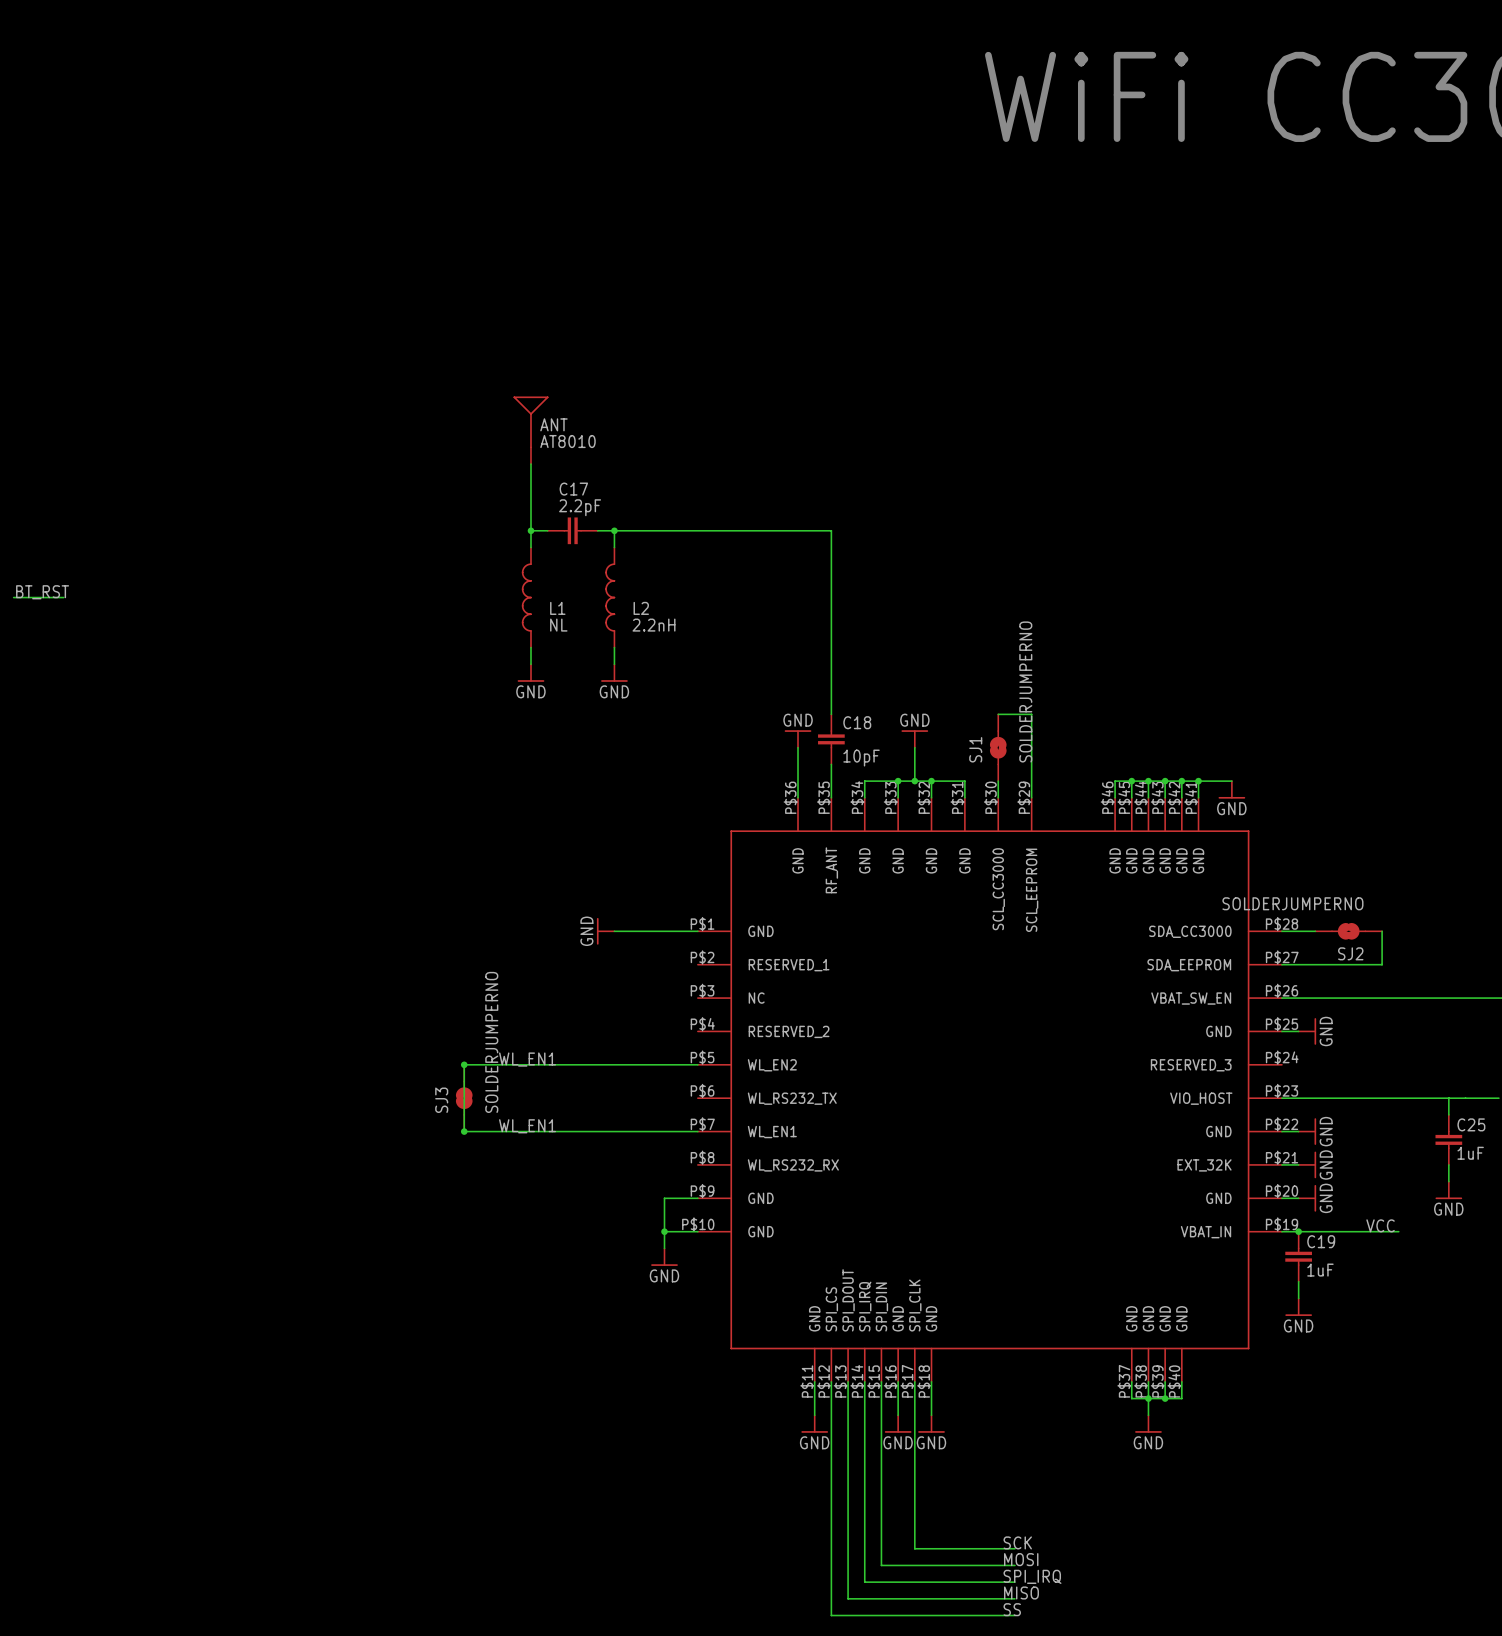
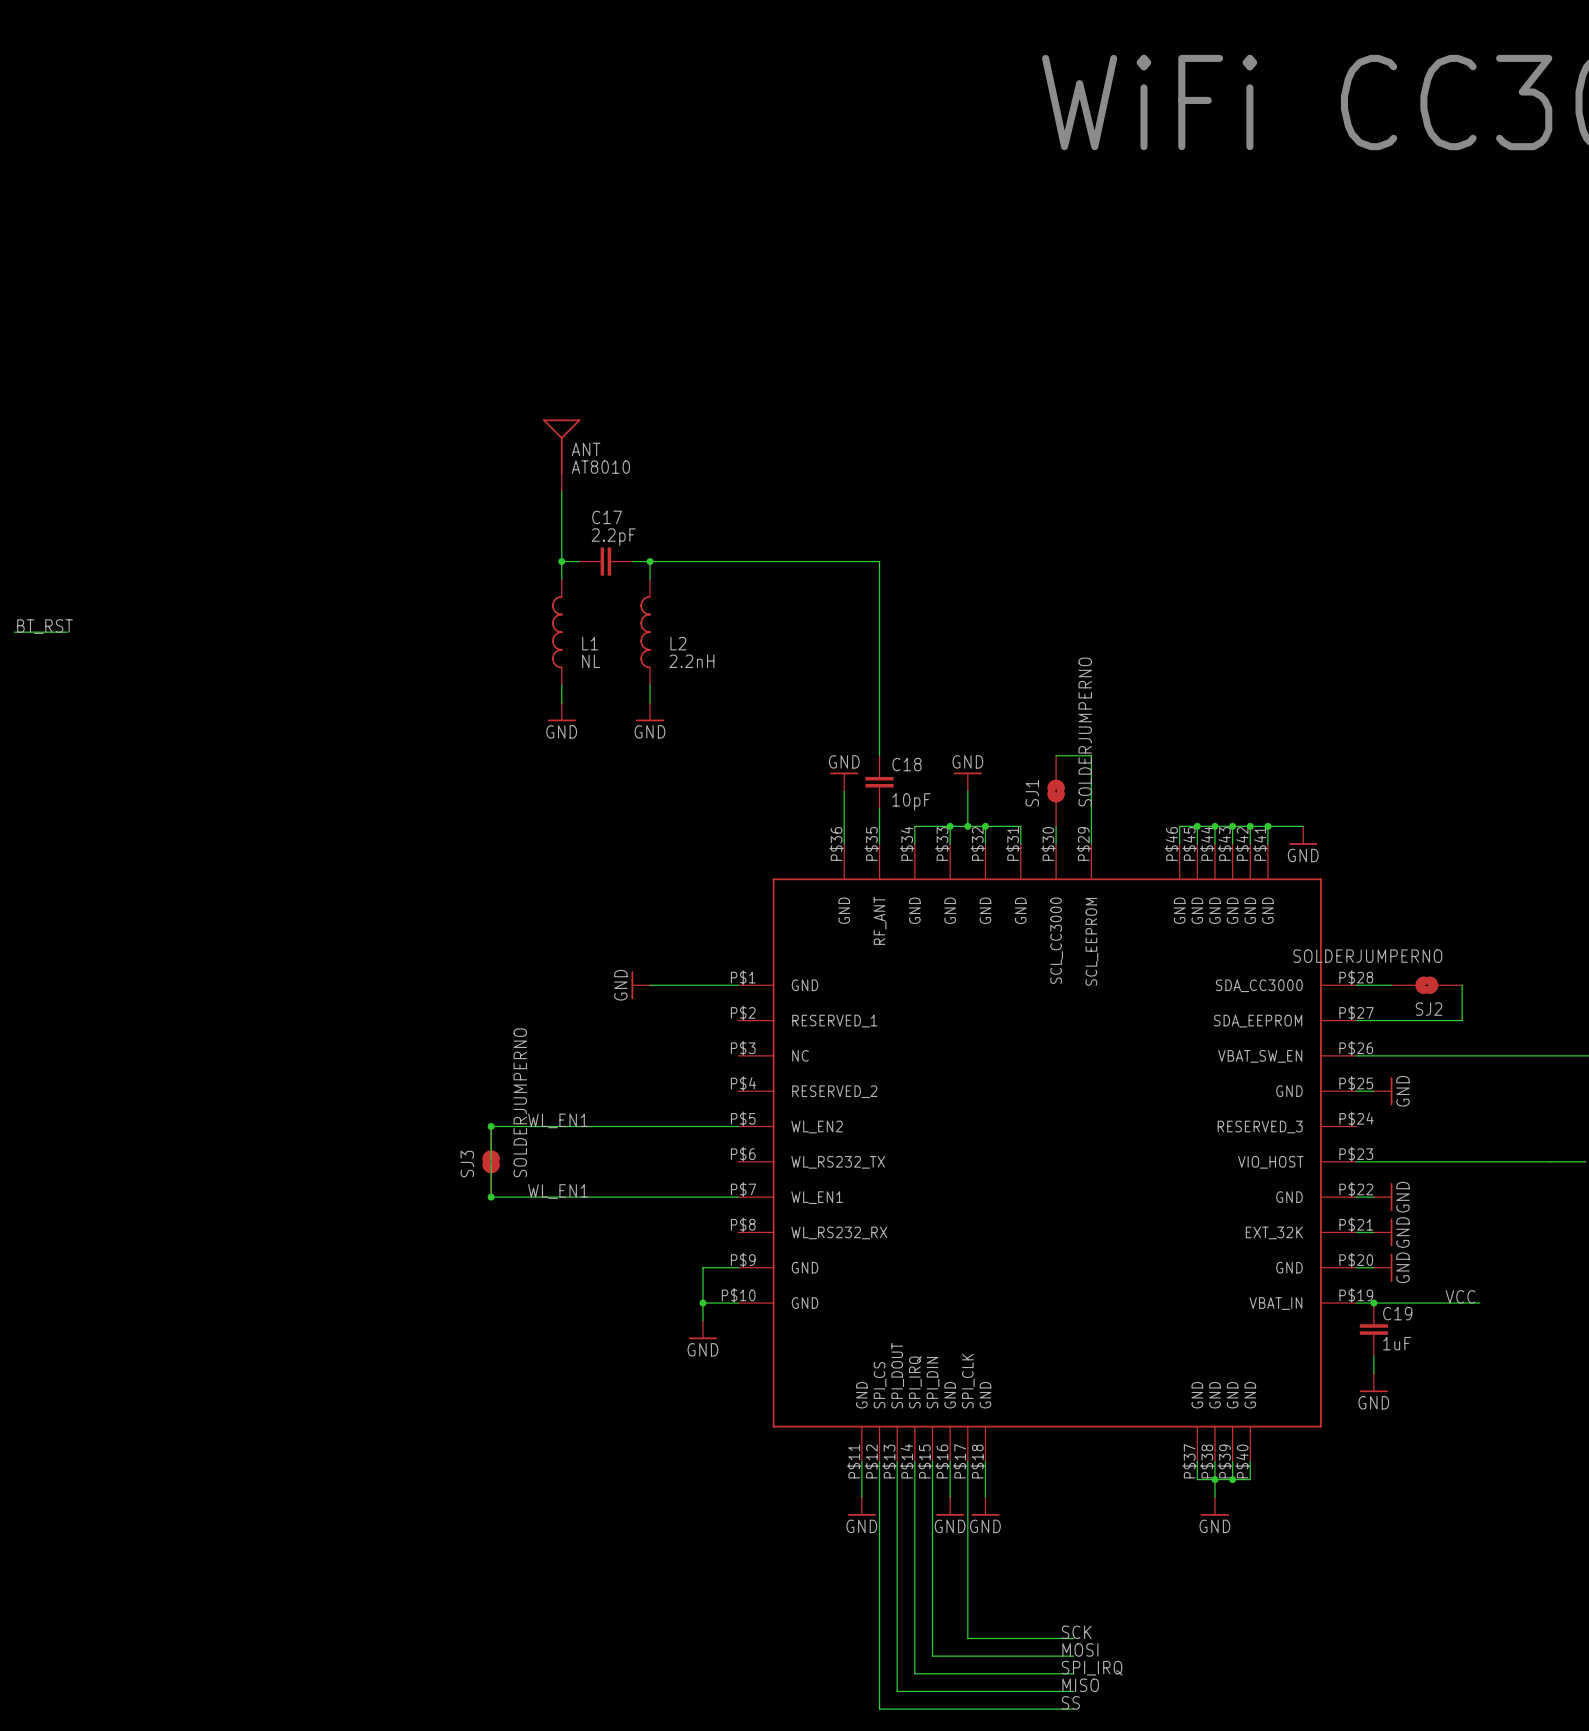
wire: (1448, 1098) (1448, 1114) -> none
C25: 1uF (1448, 1139) -> none
wire: (1448, 1164) (1448, 1181) -> none
power symbol: GND (1448, 1190) -> none

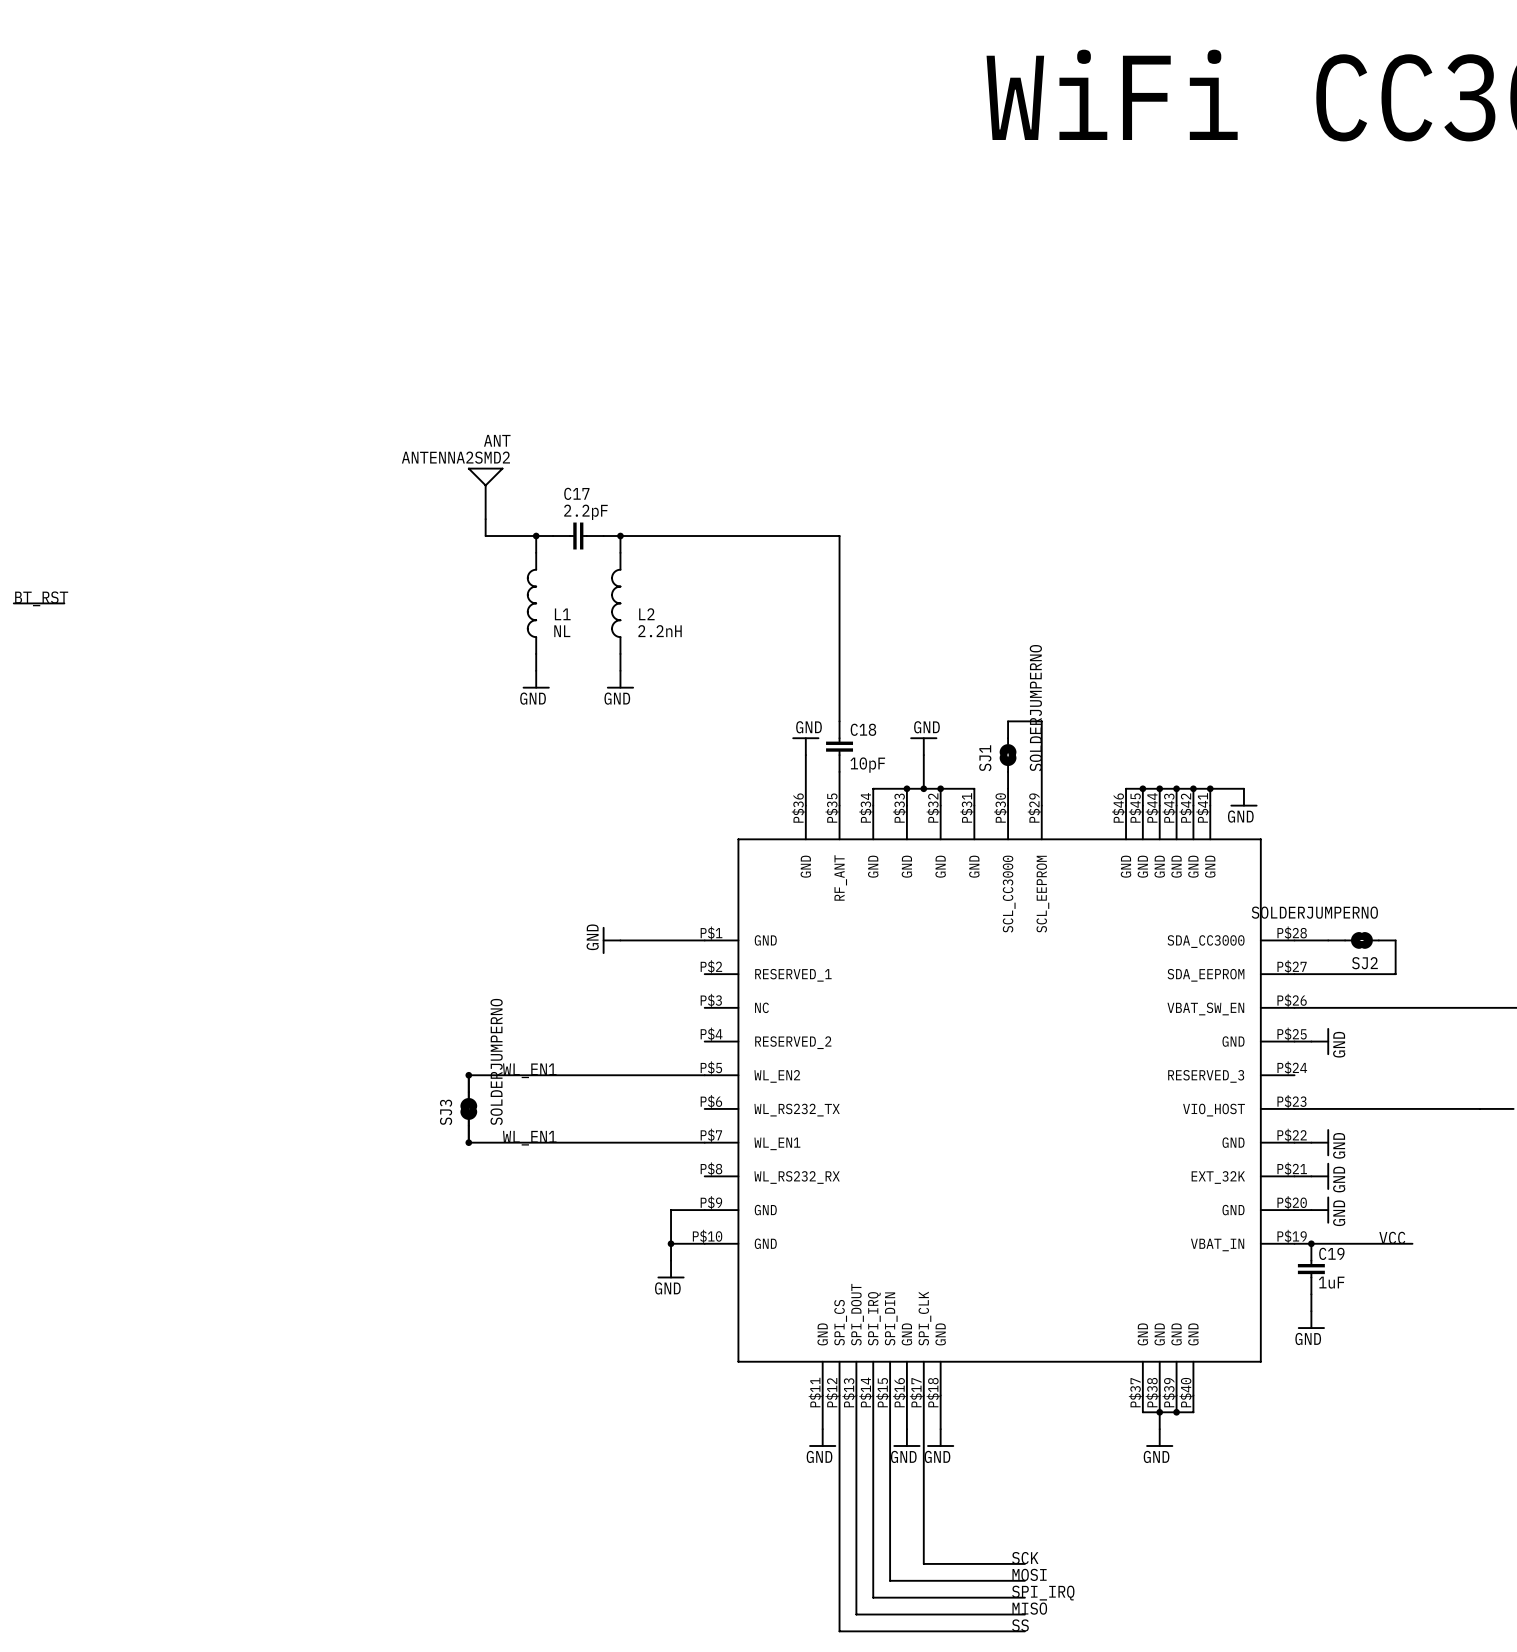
ANT: AT8010 (561, 455) -> none
wire: (561, 490) (561, 561) -> (485, 536) (536, 536)
ANT: none -> ANTENNA2SMD2 (485, 501)

